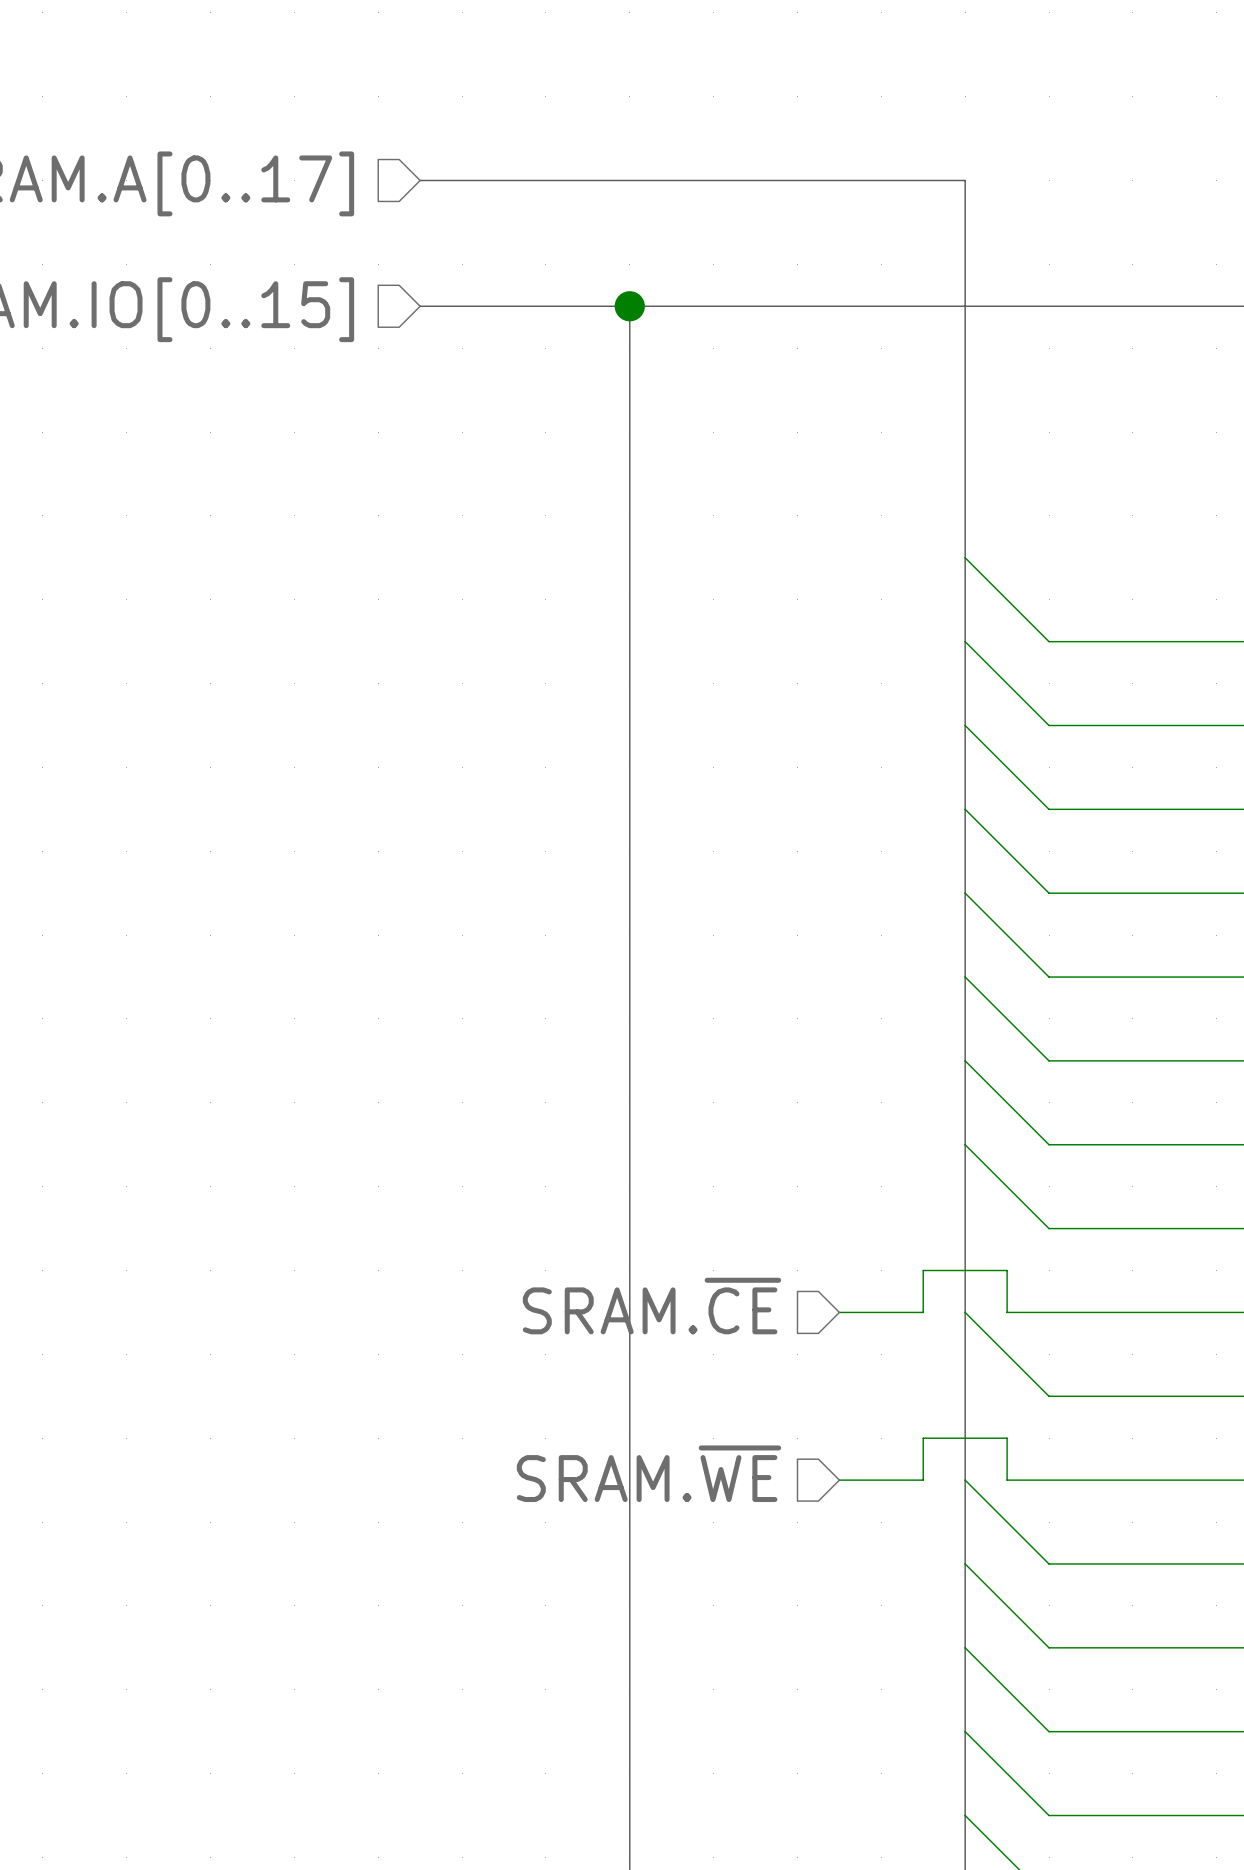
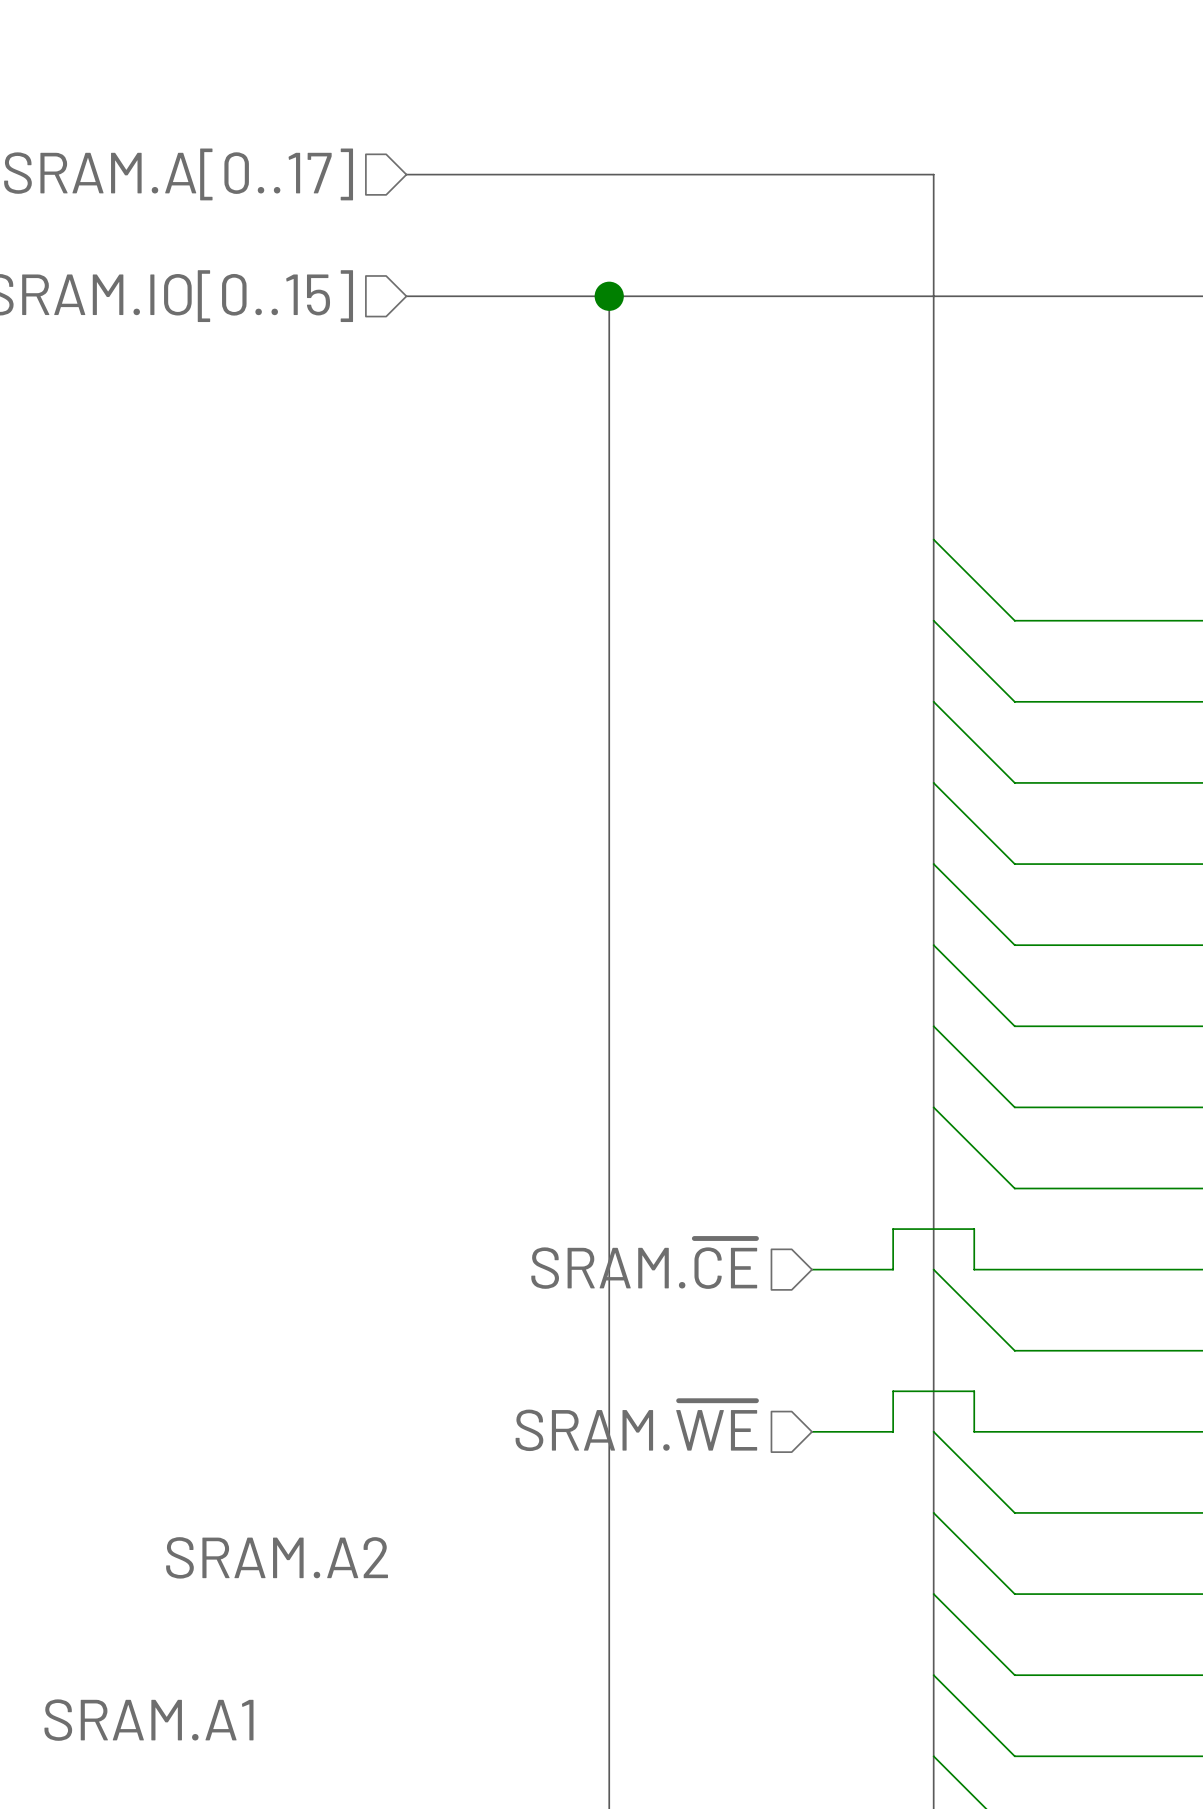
label: none -> SRAM.A2 (277, 1557)
label: none -> SRAM.A1 (148, 1720)

